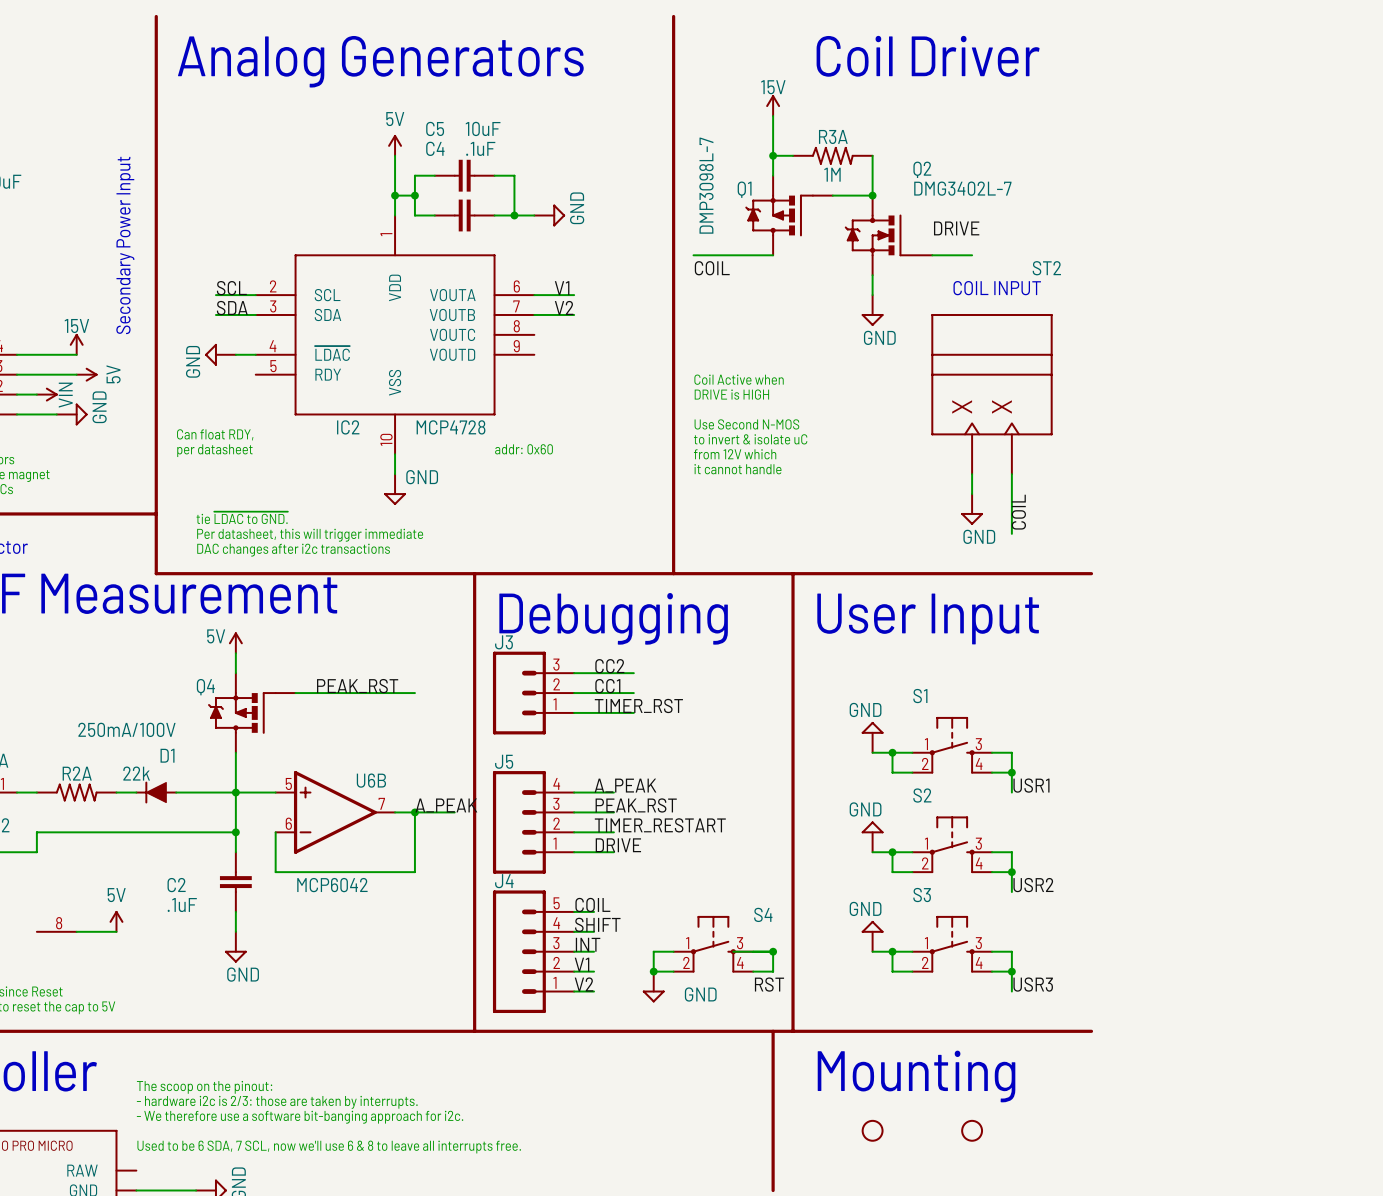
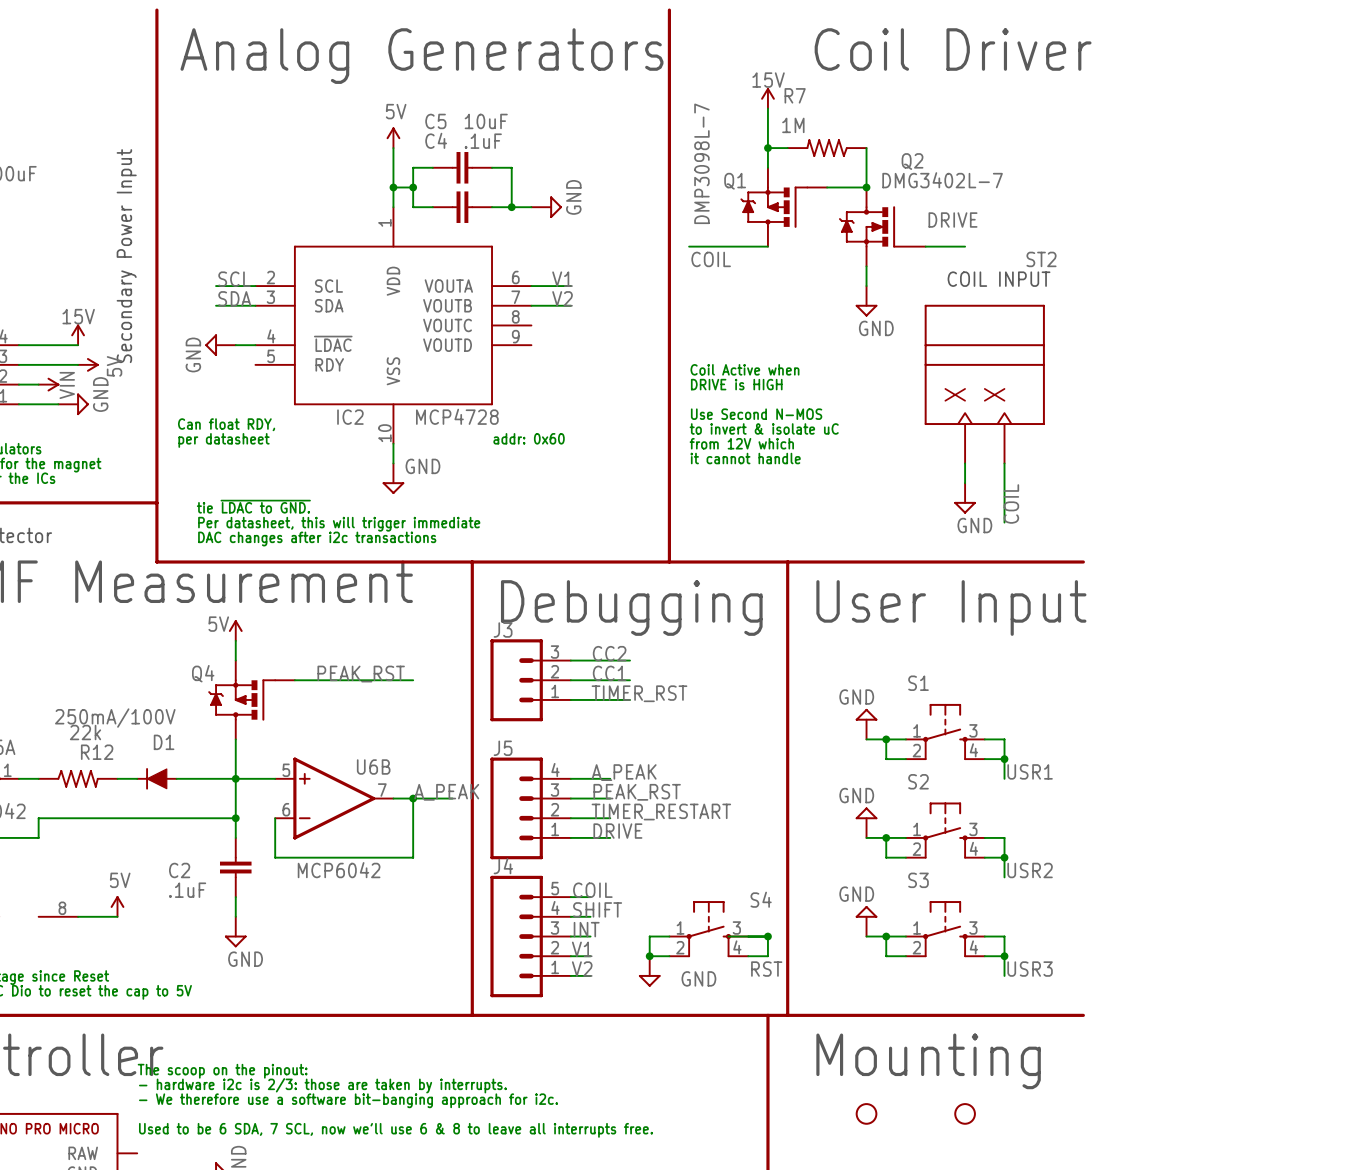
R3A: 1M (832, 155) -> none
R7: none -> 1M (827, 148)
R2A: 22k (76, 792) -> none
R12: none -> 22k (78, 778)

